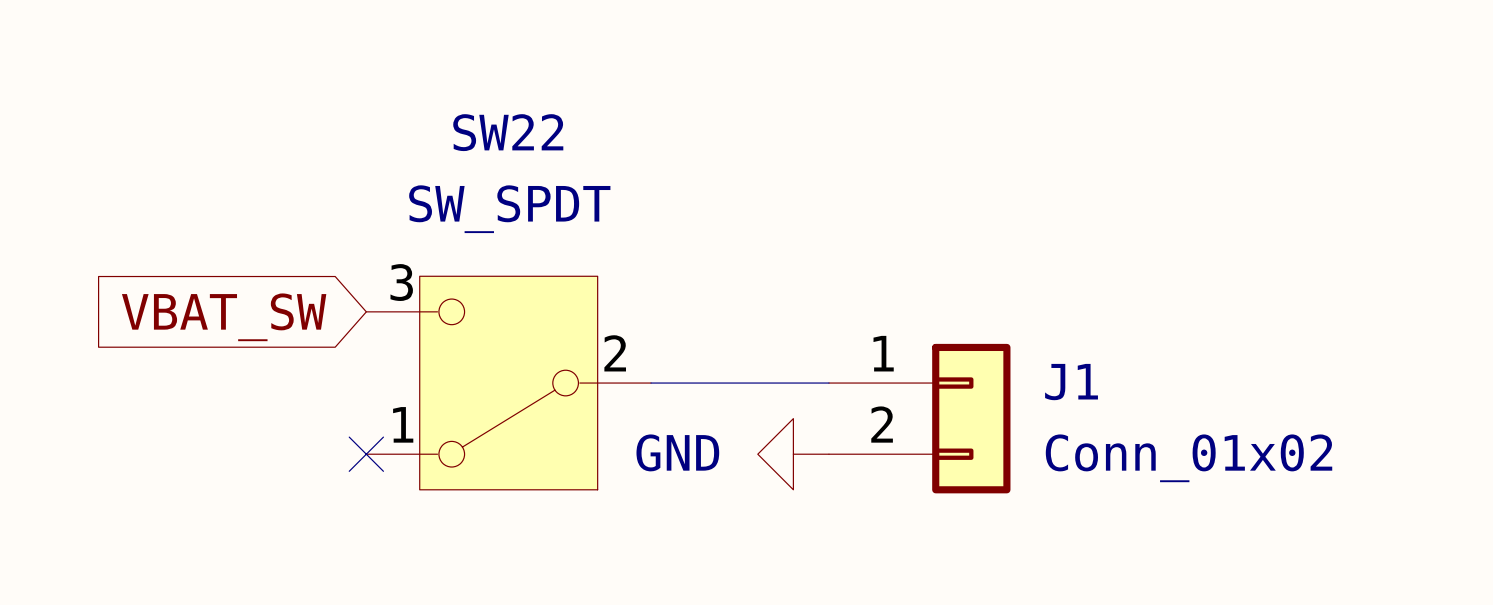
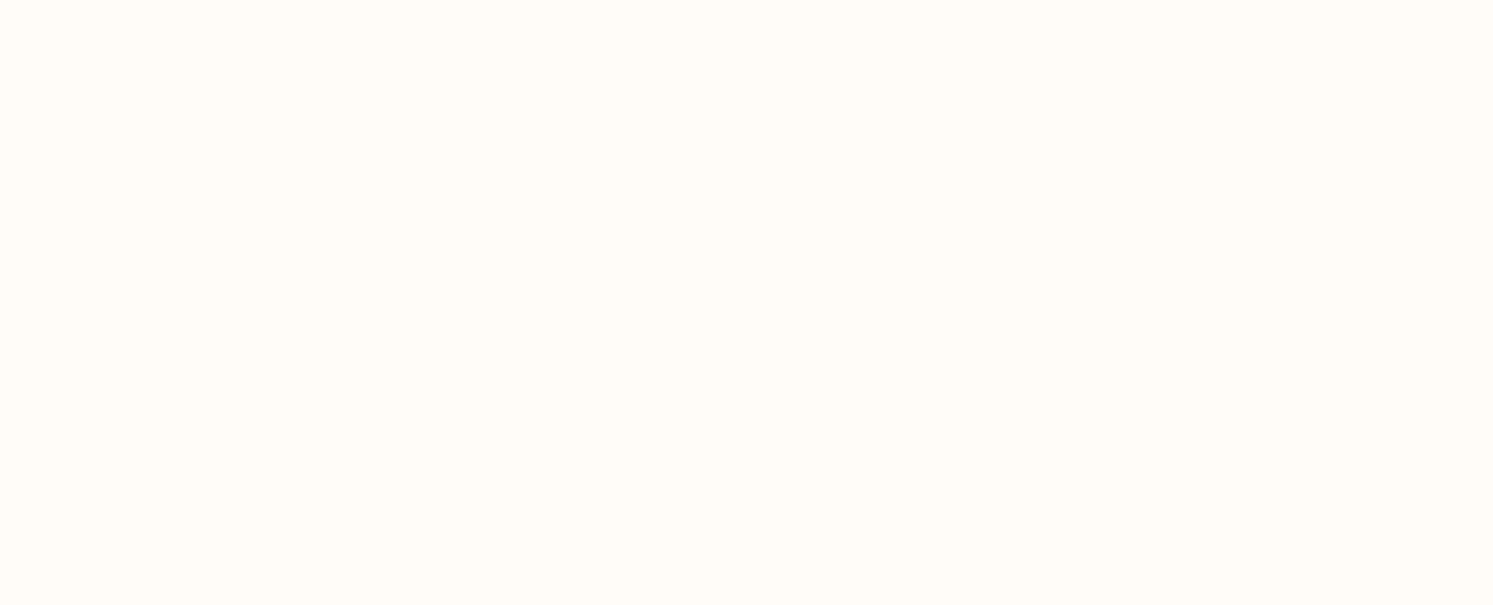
global label: VBAT_SW (224, 317) -> none
SW22: SW_SPDT (508, 383) -> none
wire: (651, 383) (828, 383) -> none
J1: Conn_01x02 (919, 418) -> none
no-connect mark: (366, 454) -> none
power symbol: GND (793, 454) -> none

